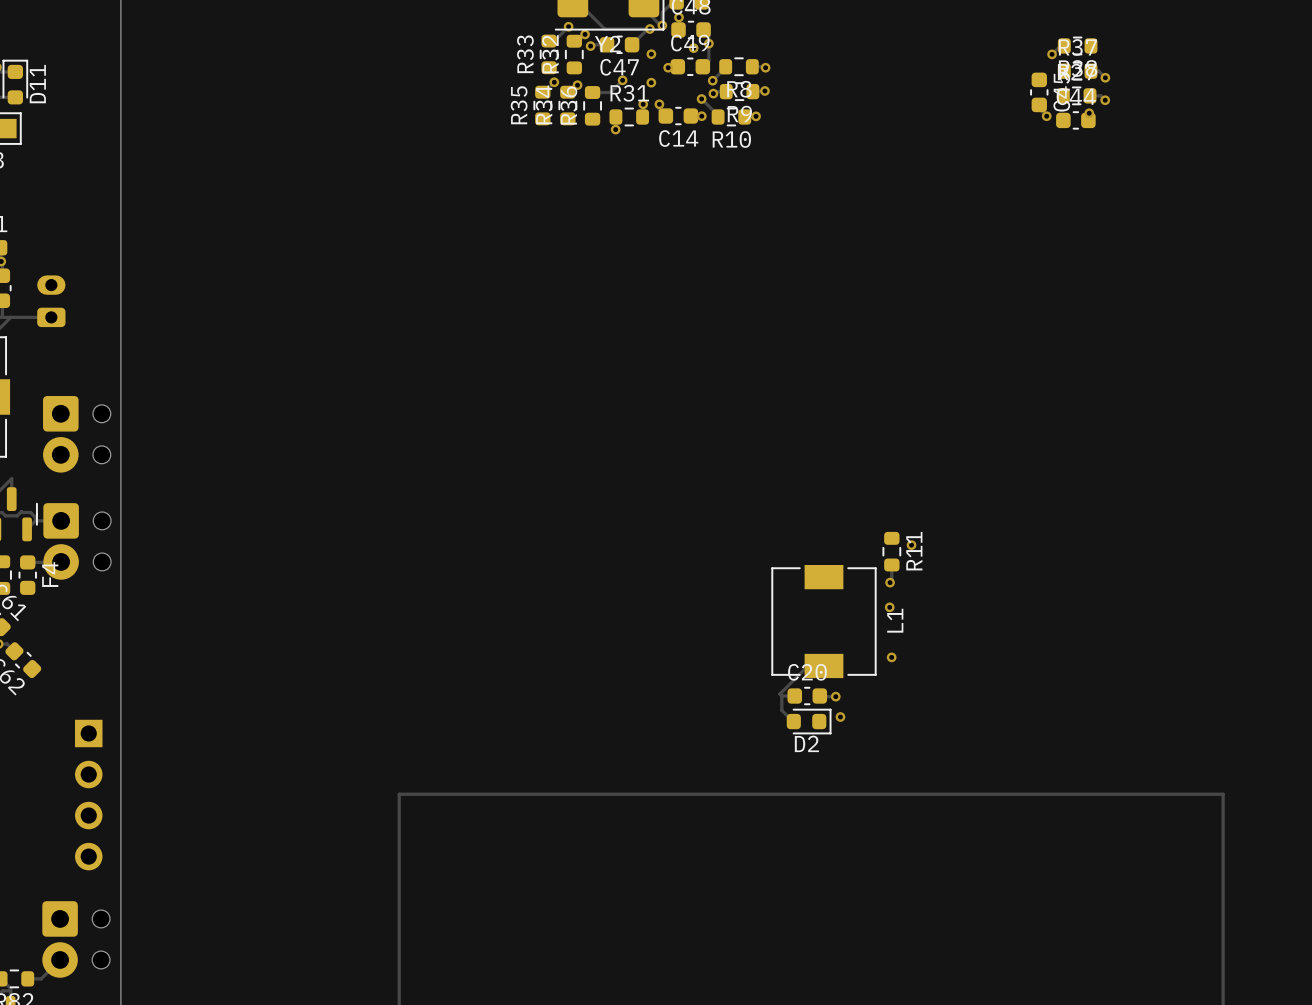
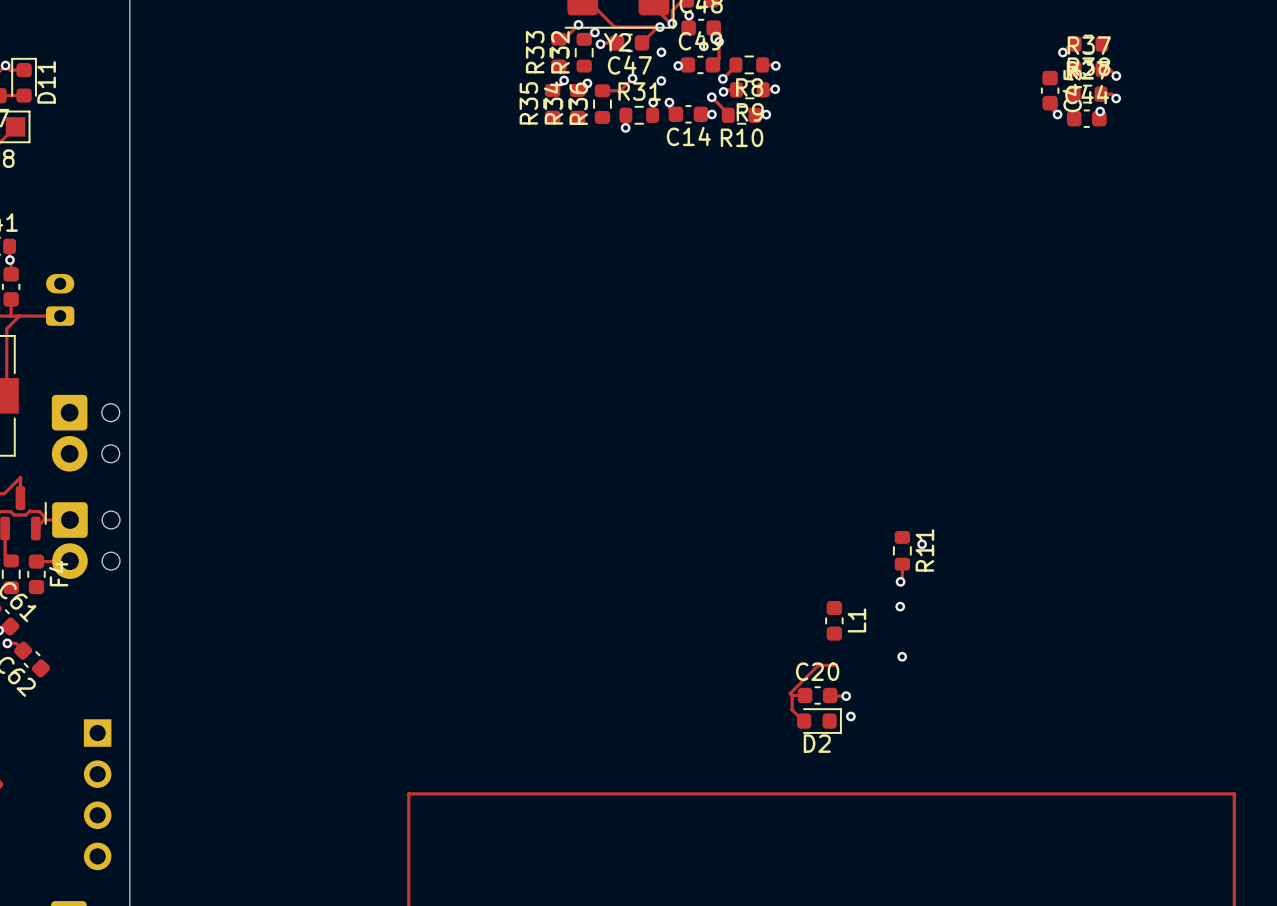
L1 footprint: [771, 565, 877, 679] -> [825, 601, 844, 641]
L1 name position: L1 (895, 620) -> L1 (856, 620)

